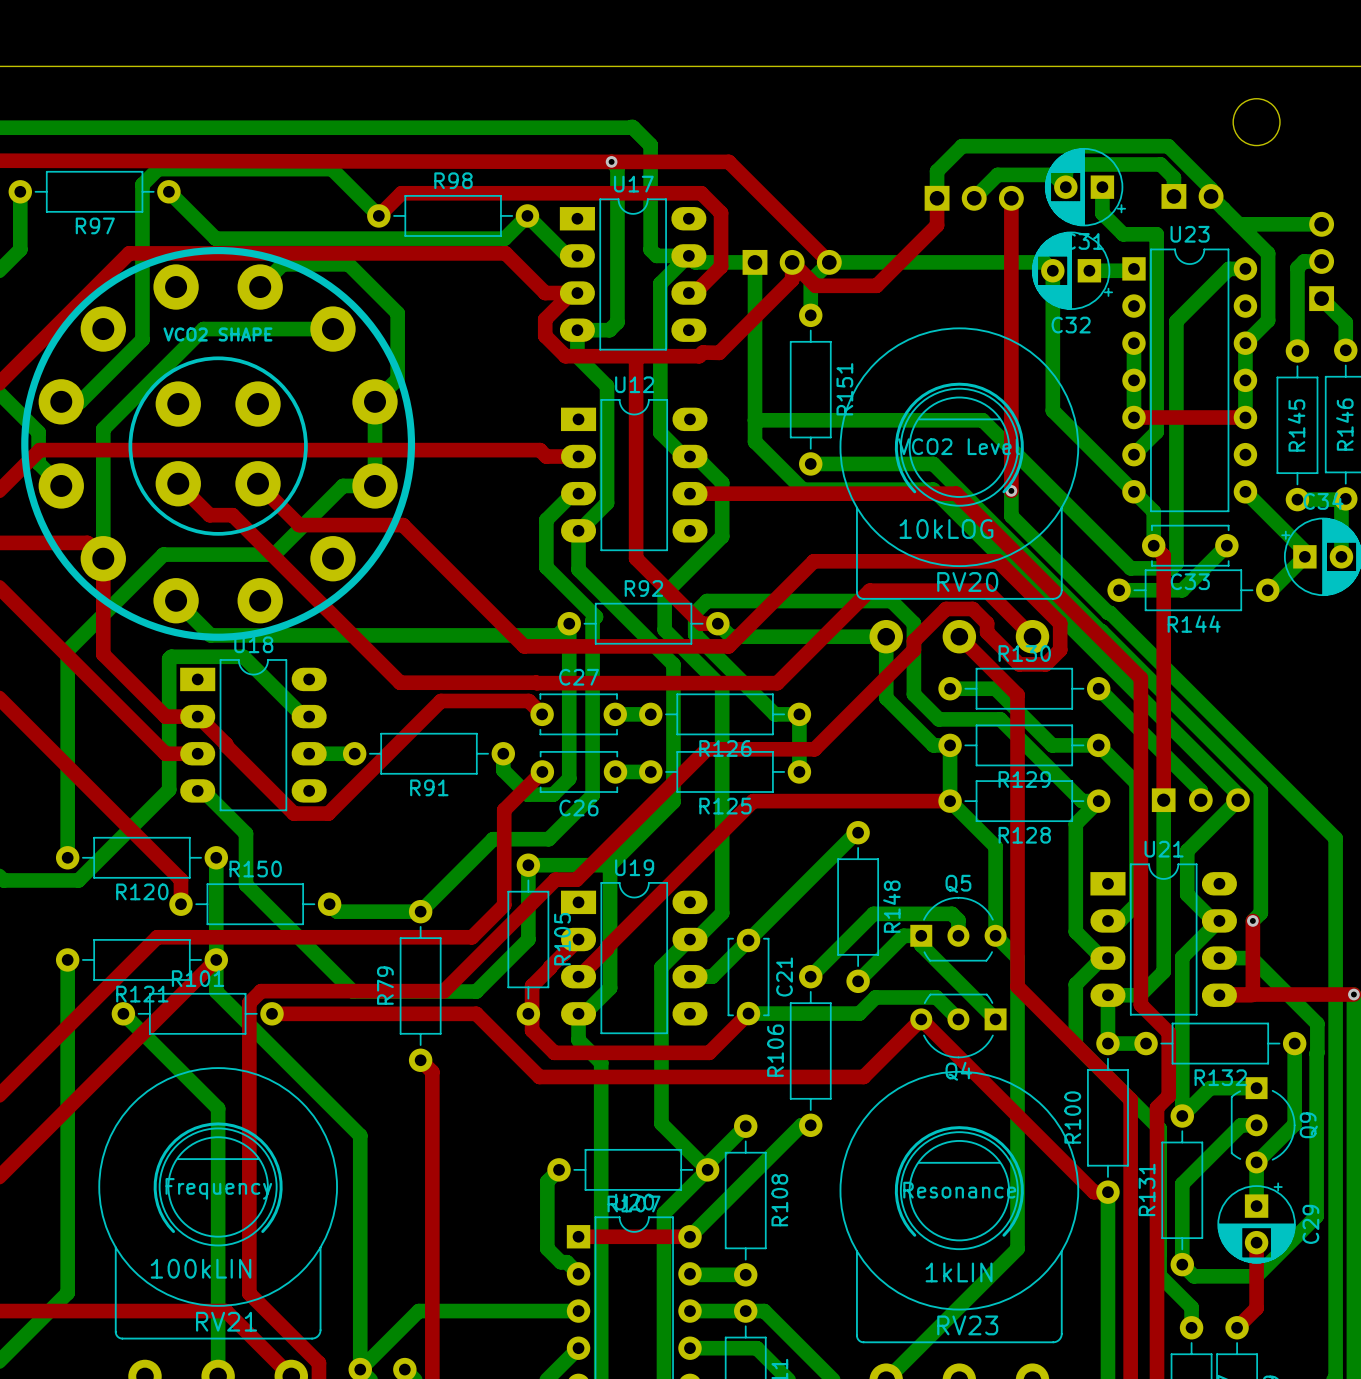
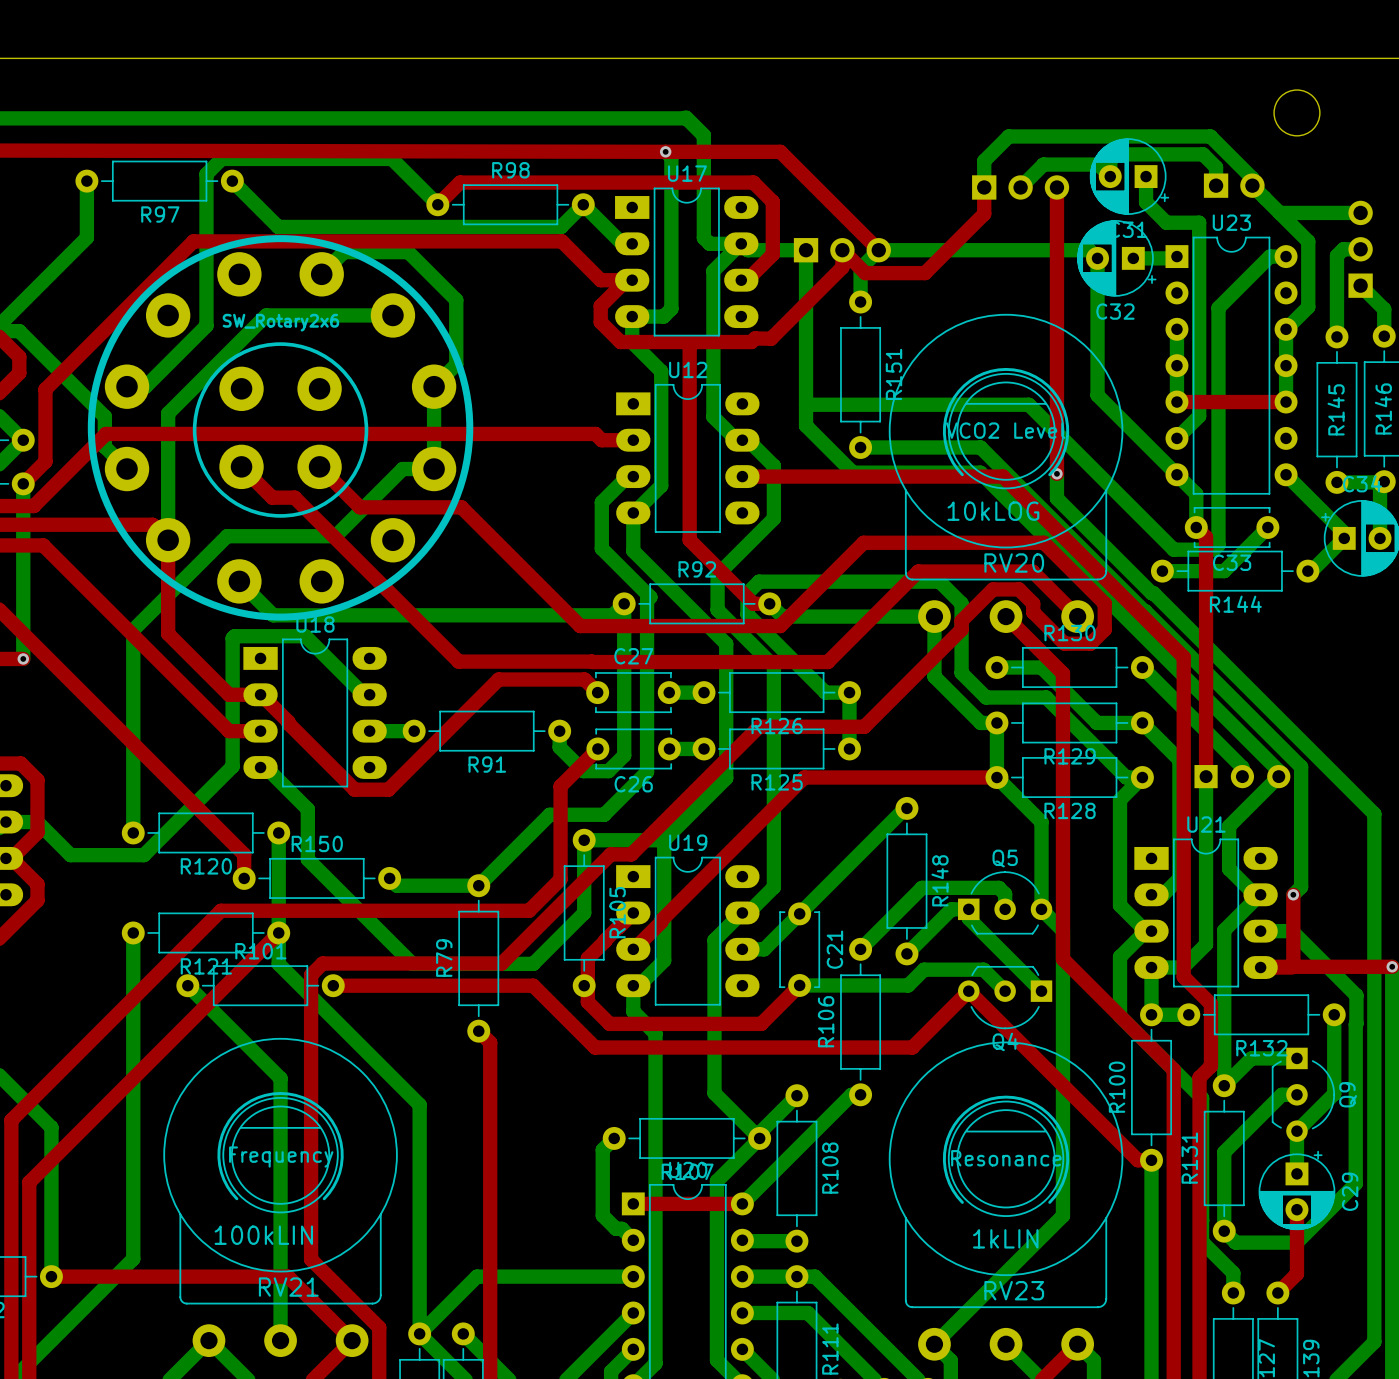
part value: VCO2 SHAPE (217, 334) -> SW_Rotary2x6 (280, 322)

